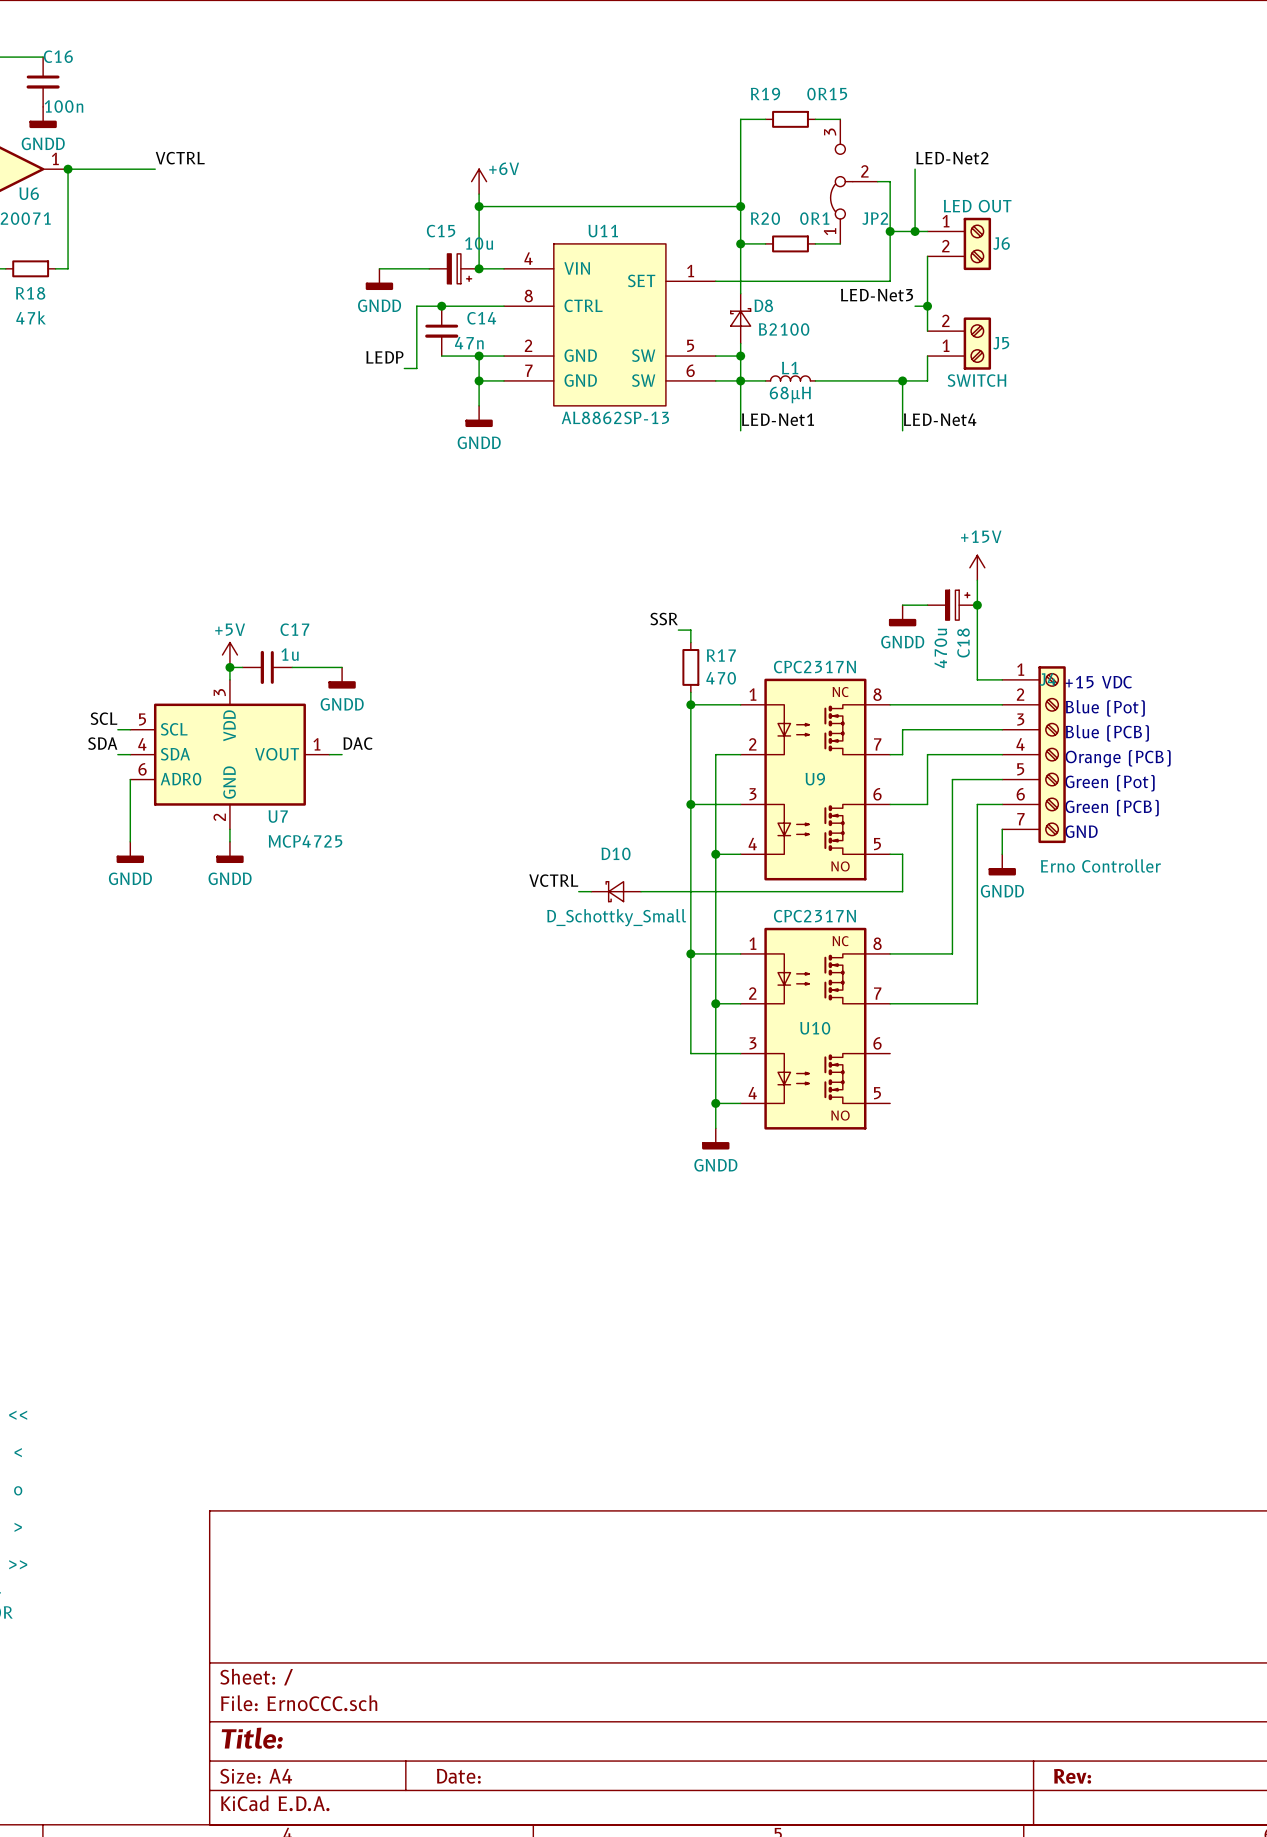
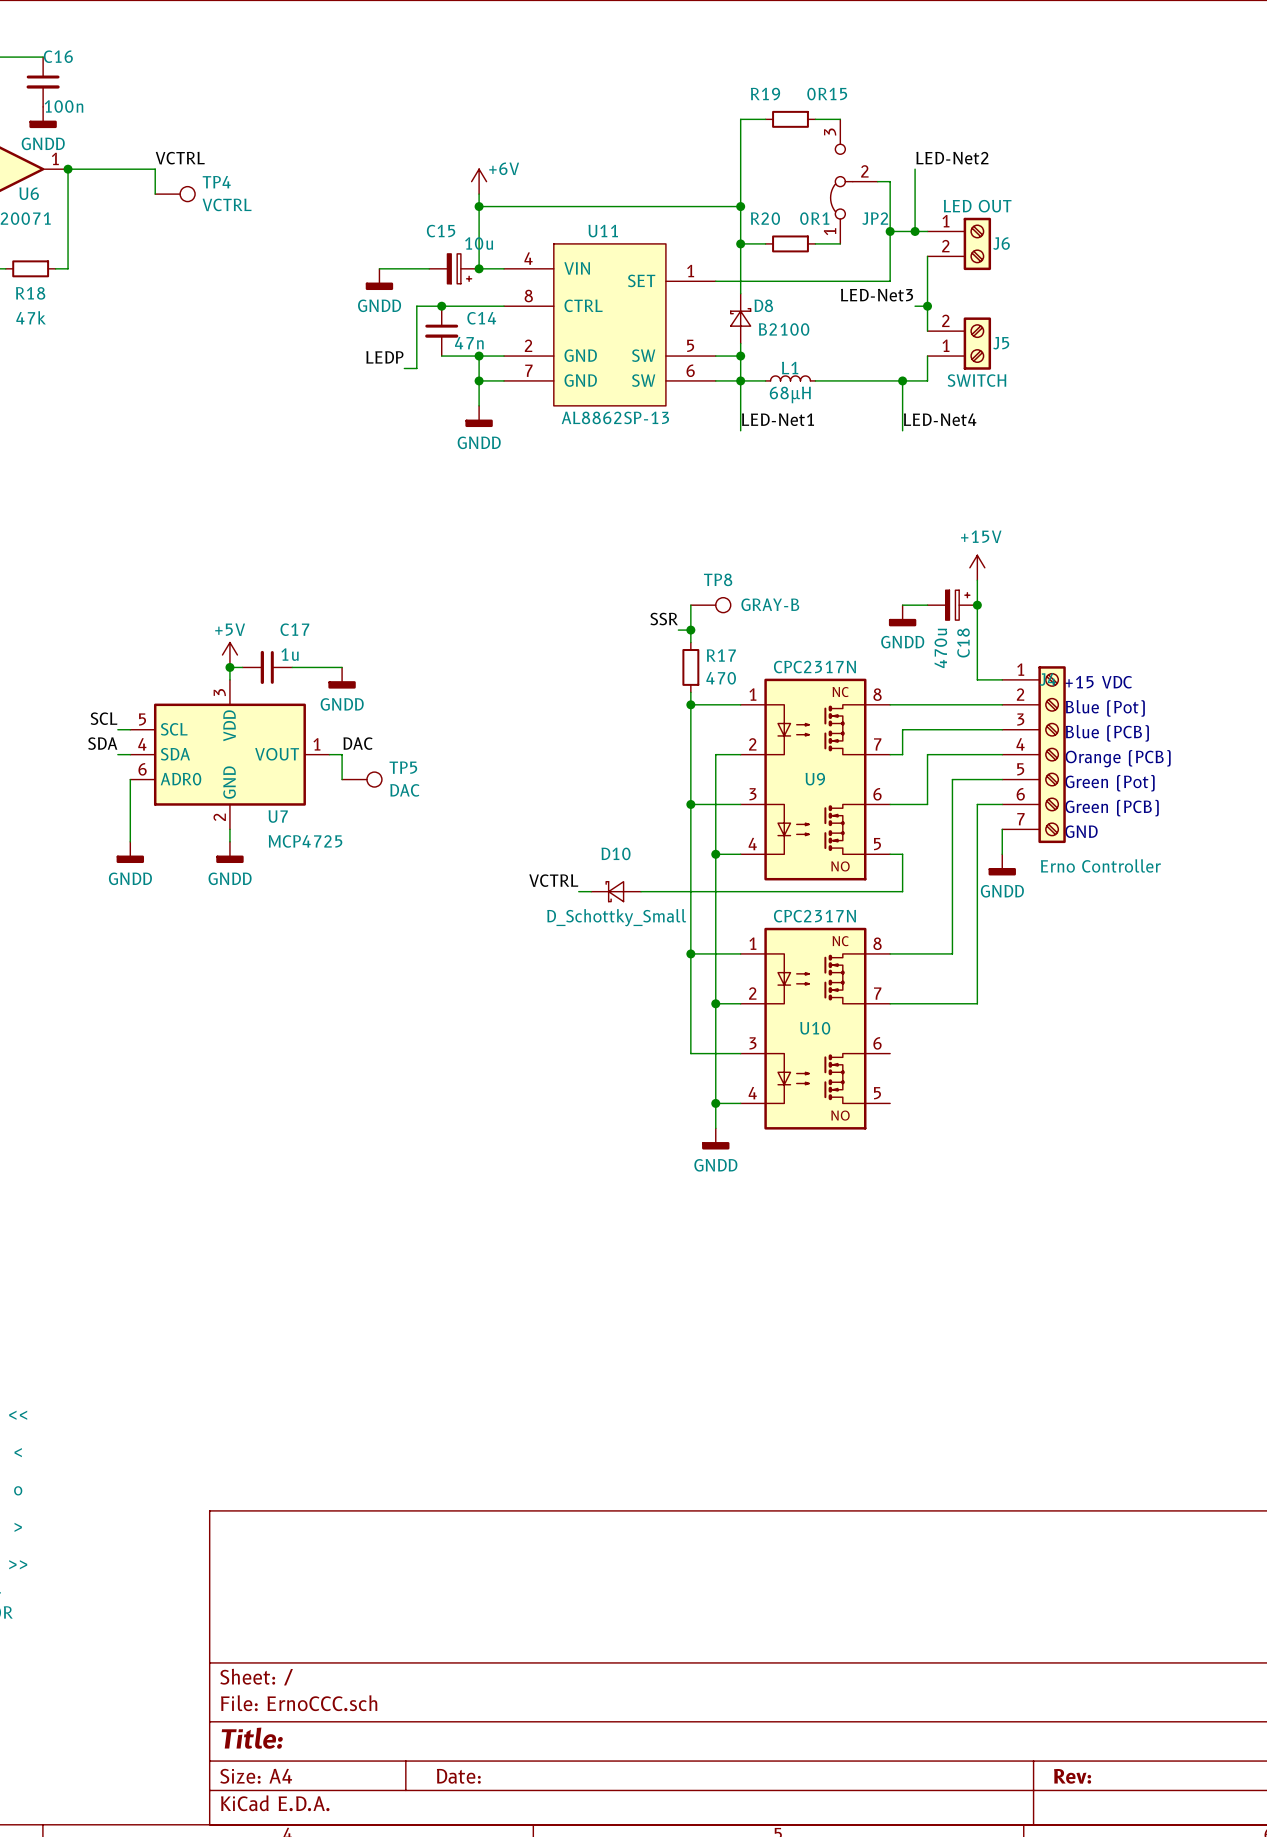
wire: none -> (155, 169) (155, 194)
TP4: none -> VCTRL (175, 194)
wire: none -> (690, 605) (690, 630)
TP8: none -> GRAY-B (710, 605)
junction: none -> (690, 630)
wire: none -> (342, 754) (342, 779)
TP5: none -> DAC (362, 779)

